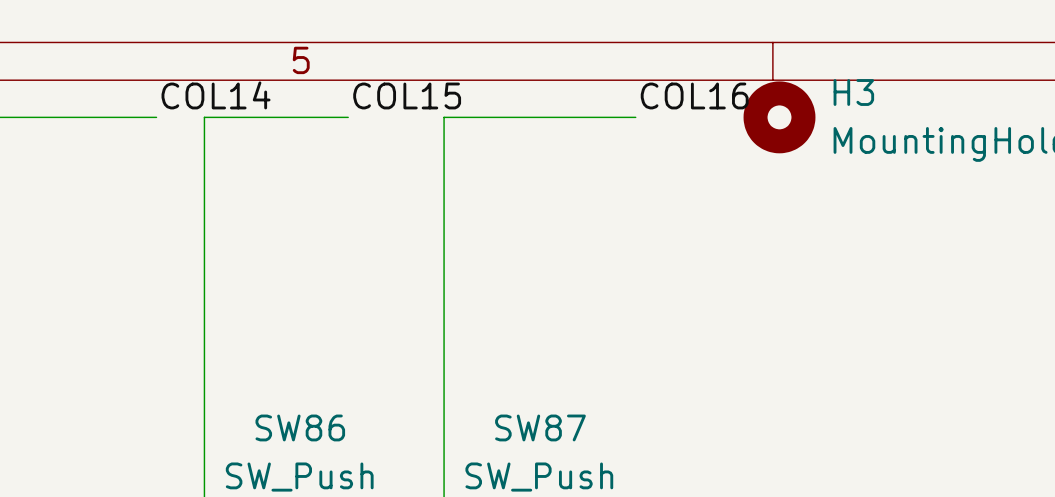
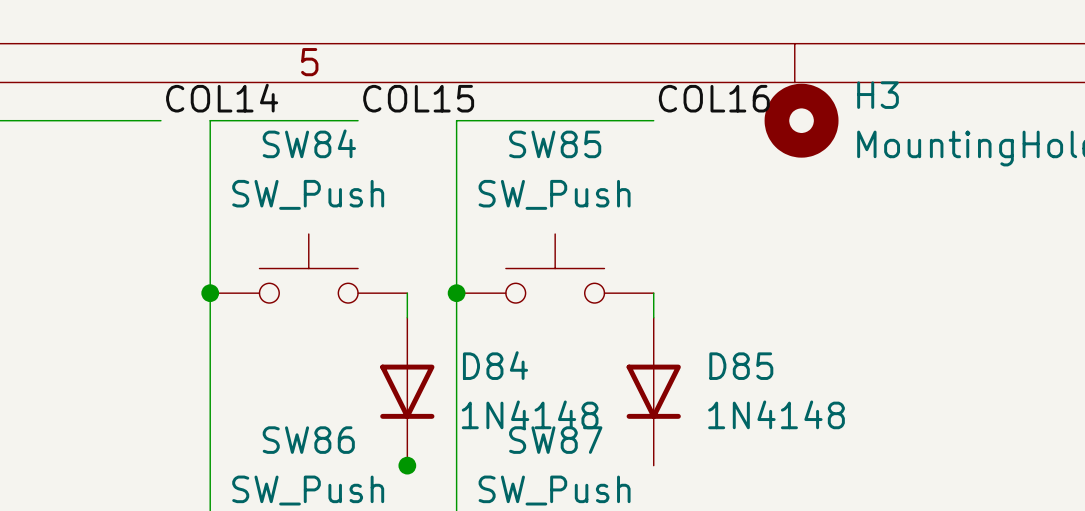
SW84: none -> SW_Push (308, 268)
SW85: none -> SW_Push (555, 268)
junction: none -> (210, 293)
wire: none -> (407, 293) (407, 317)
junction: none -> (456, 293)
wire: none -> (653, 293) (653, 317)
D84: none -> 1N4148 (407, 391)
D85: none -> 1N4148 (653, 391)
junction: none -> (407, 465)

